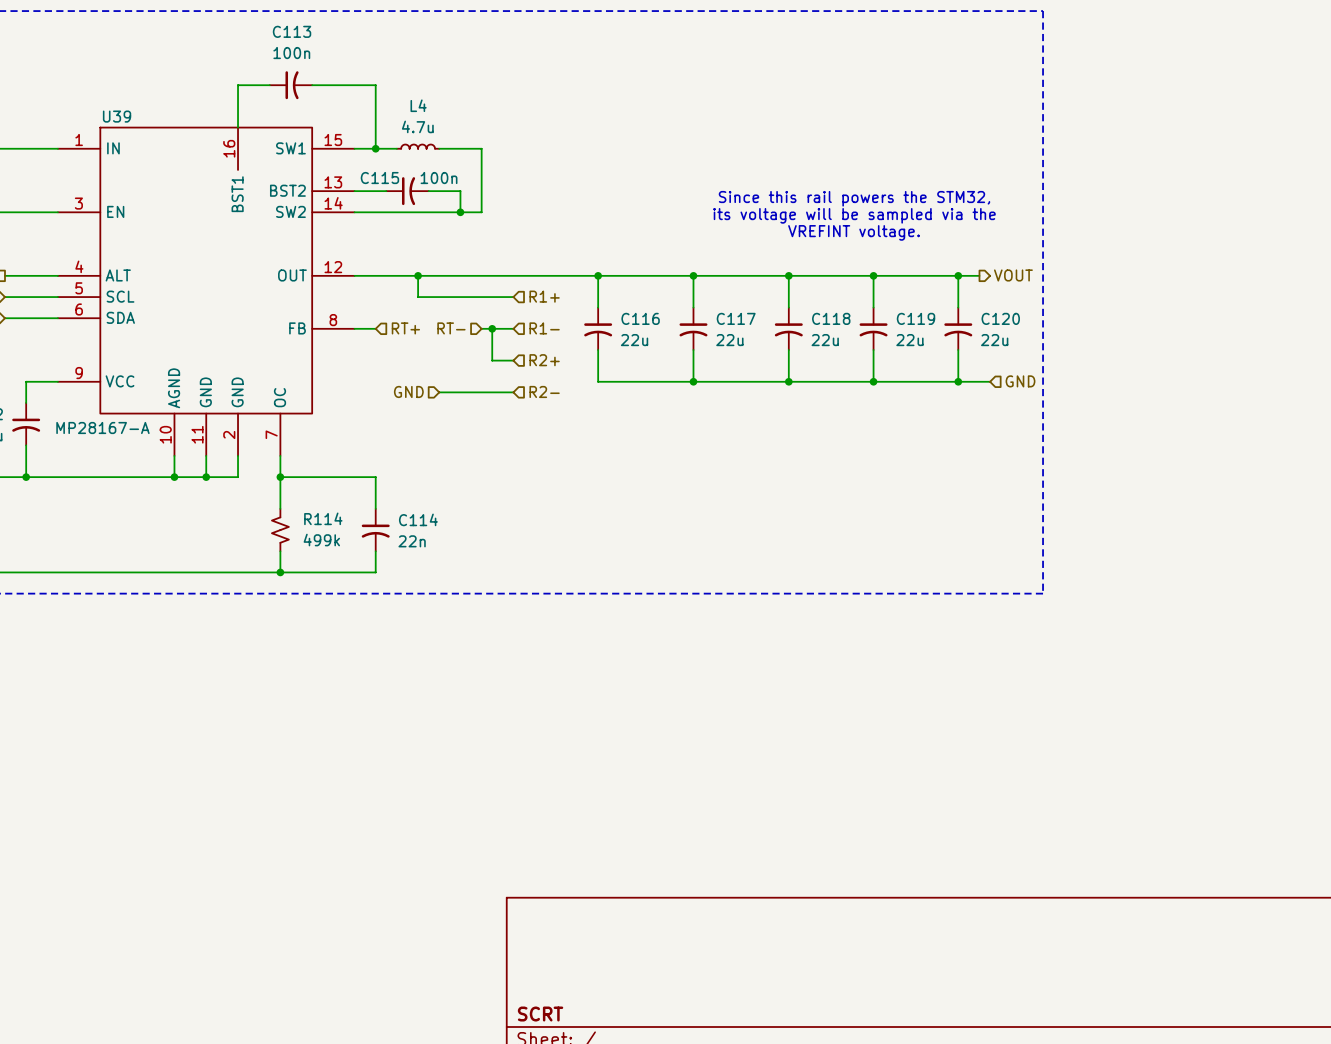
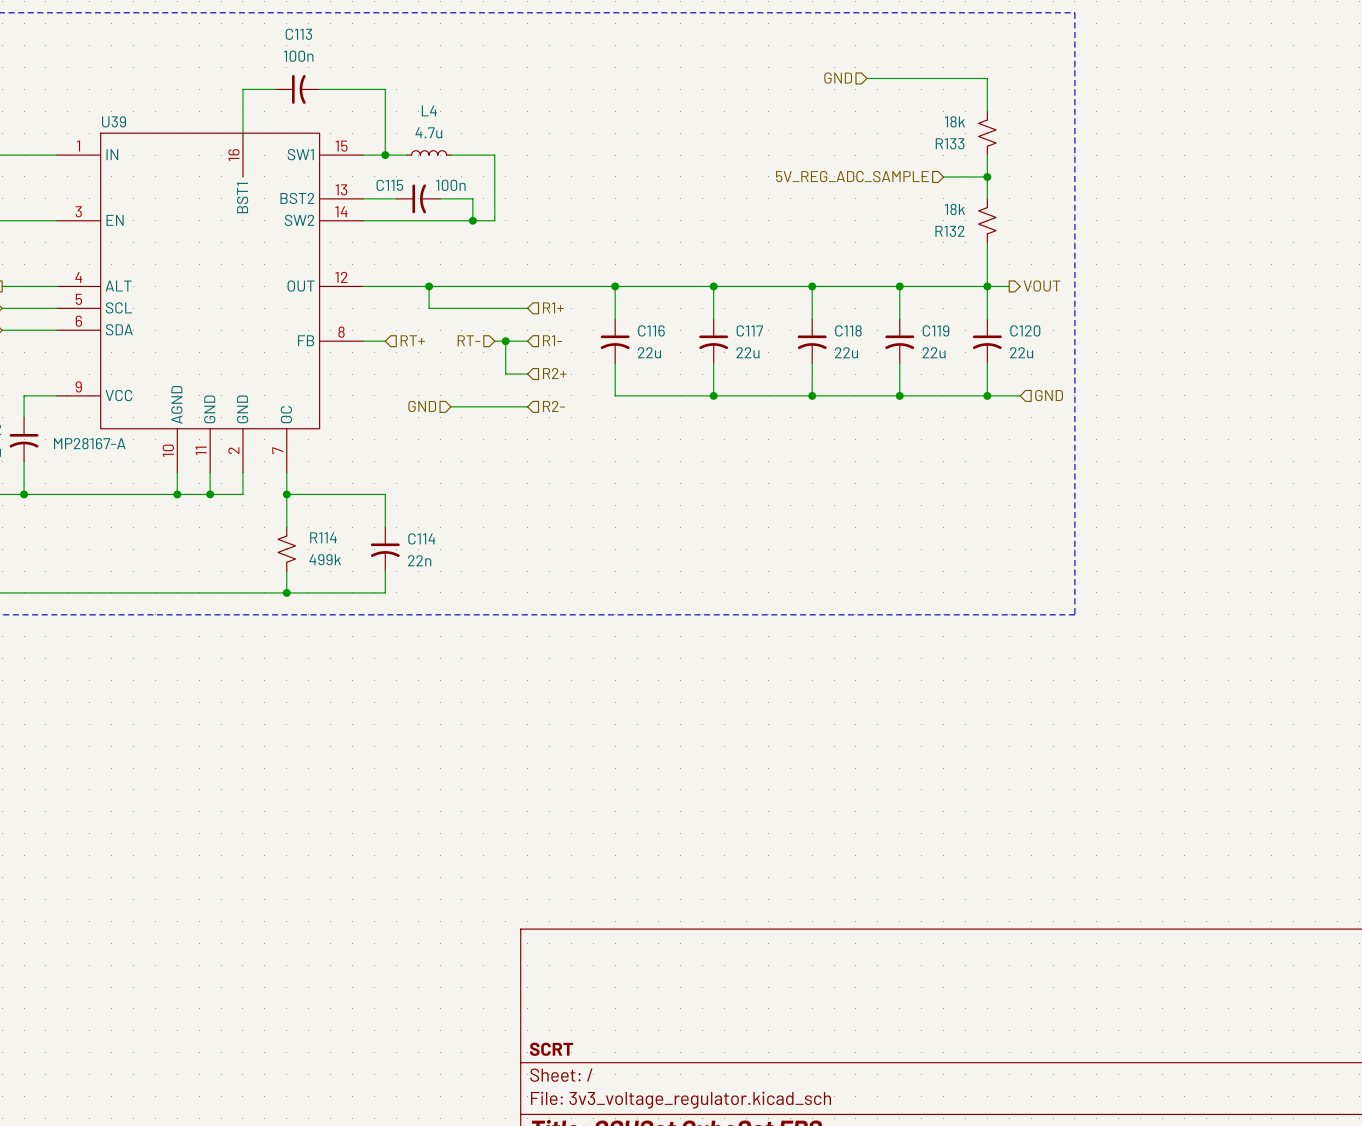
hierarchical label: none -> GND (838, 78)
wire: none -> (866, 78) (987, 78) (987, 111)
R133: none -> 18k (987, 133)
wire: none -> (987, 155) (987, 198)
wire: none -> (943, 176) (987, 176)
junction: none -> (987, 176)
hierarchical label: none -> 5V_REG_ADC_SAMPLE (852, 176)
text: Since this rail powers the STM32, (854, 198) -> none
R132: none -> 18k (987, 220)
text: its voltage will be sampled via the (854, 215) -> none
text: VREFINT voltage. (853, 232) -> none
wire: none -> (987, 242) (987, 286)

